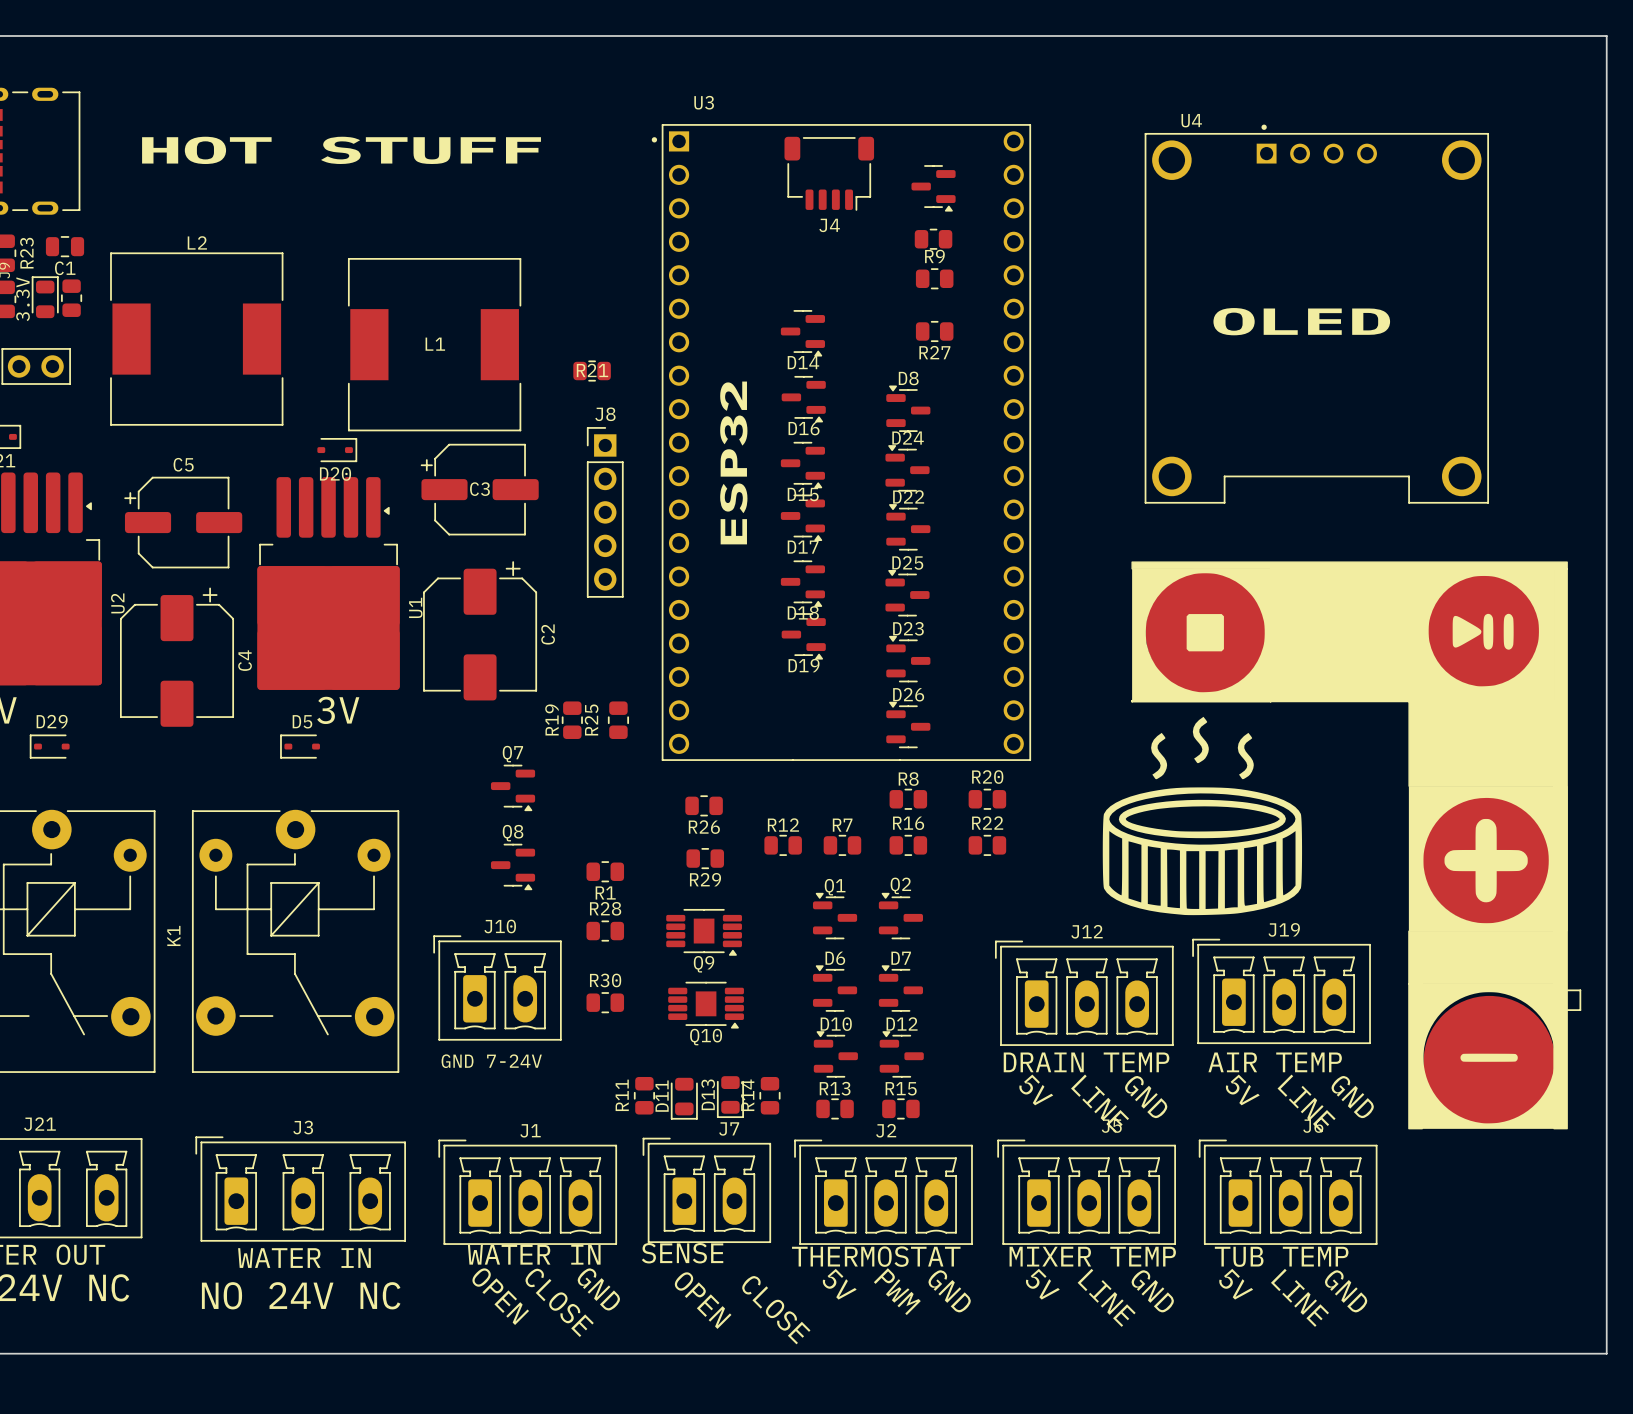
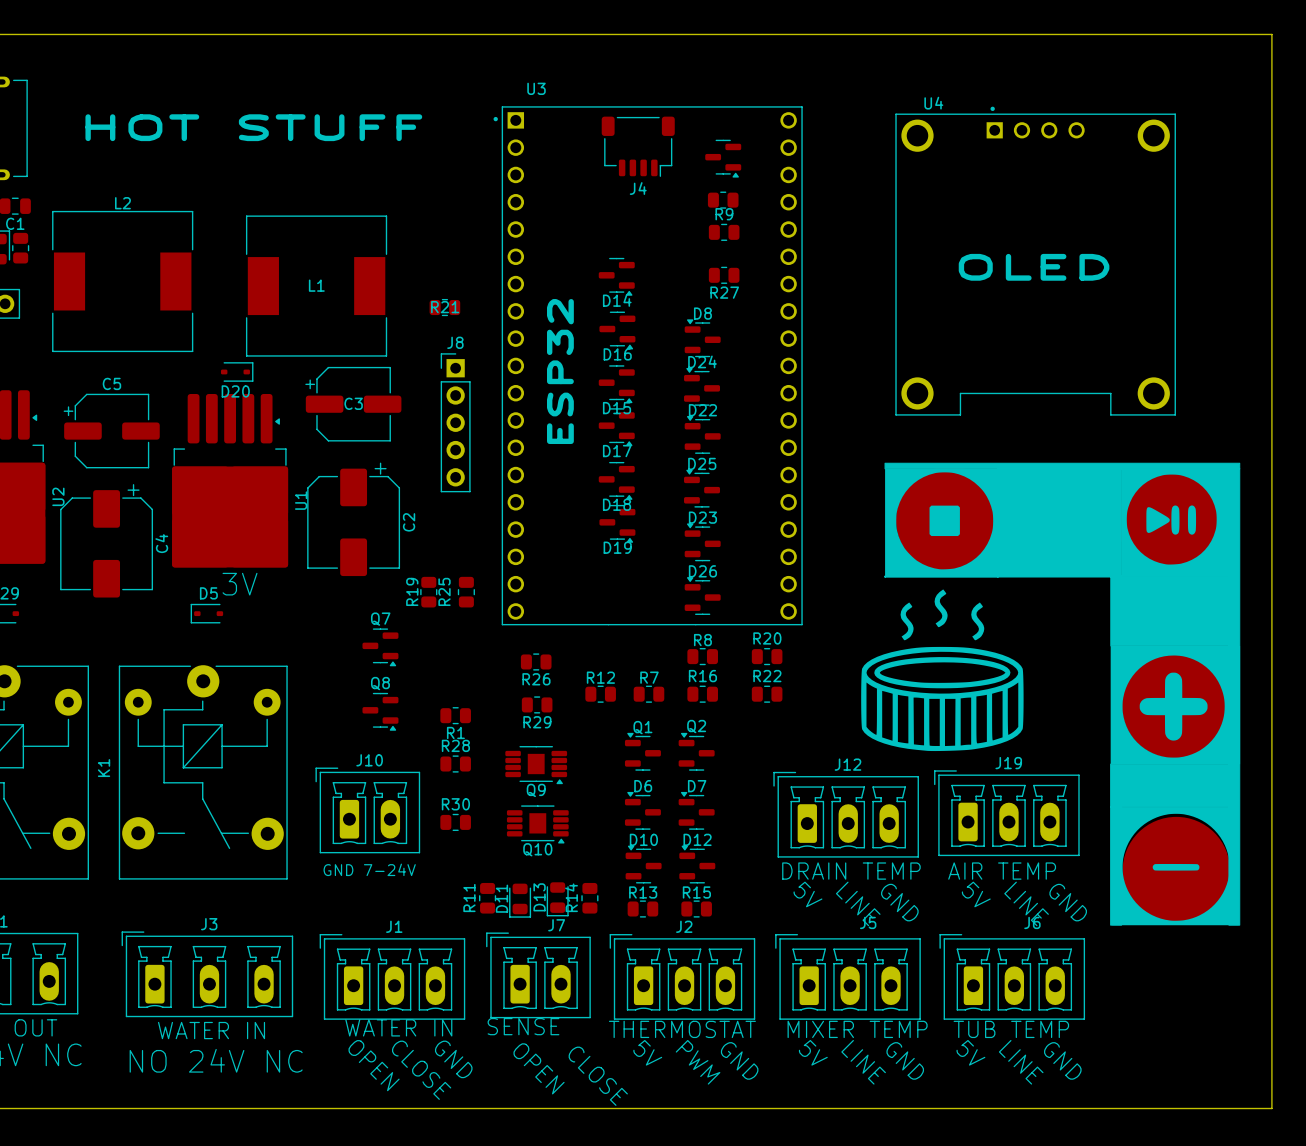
line: (1560, 990) (1580, 990) (1580, 1010) (1560, 1010) (1560, 990) -> none

